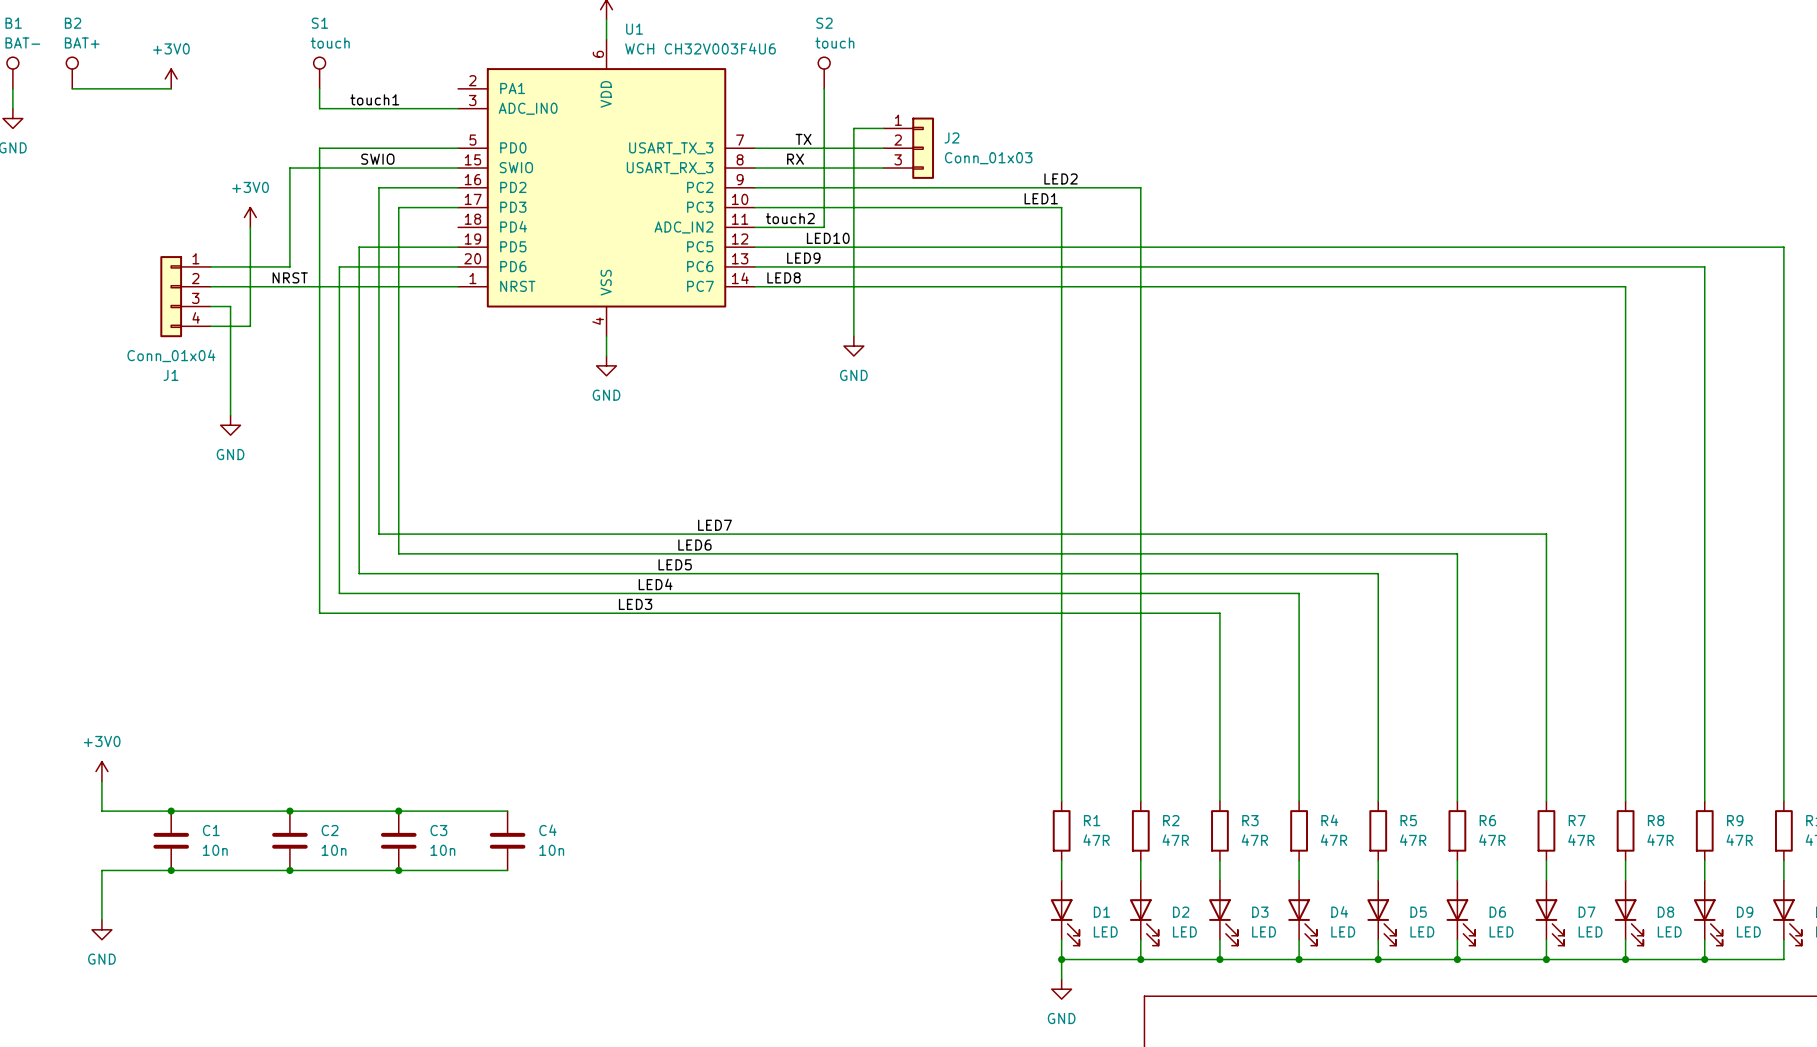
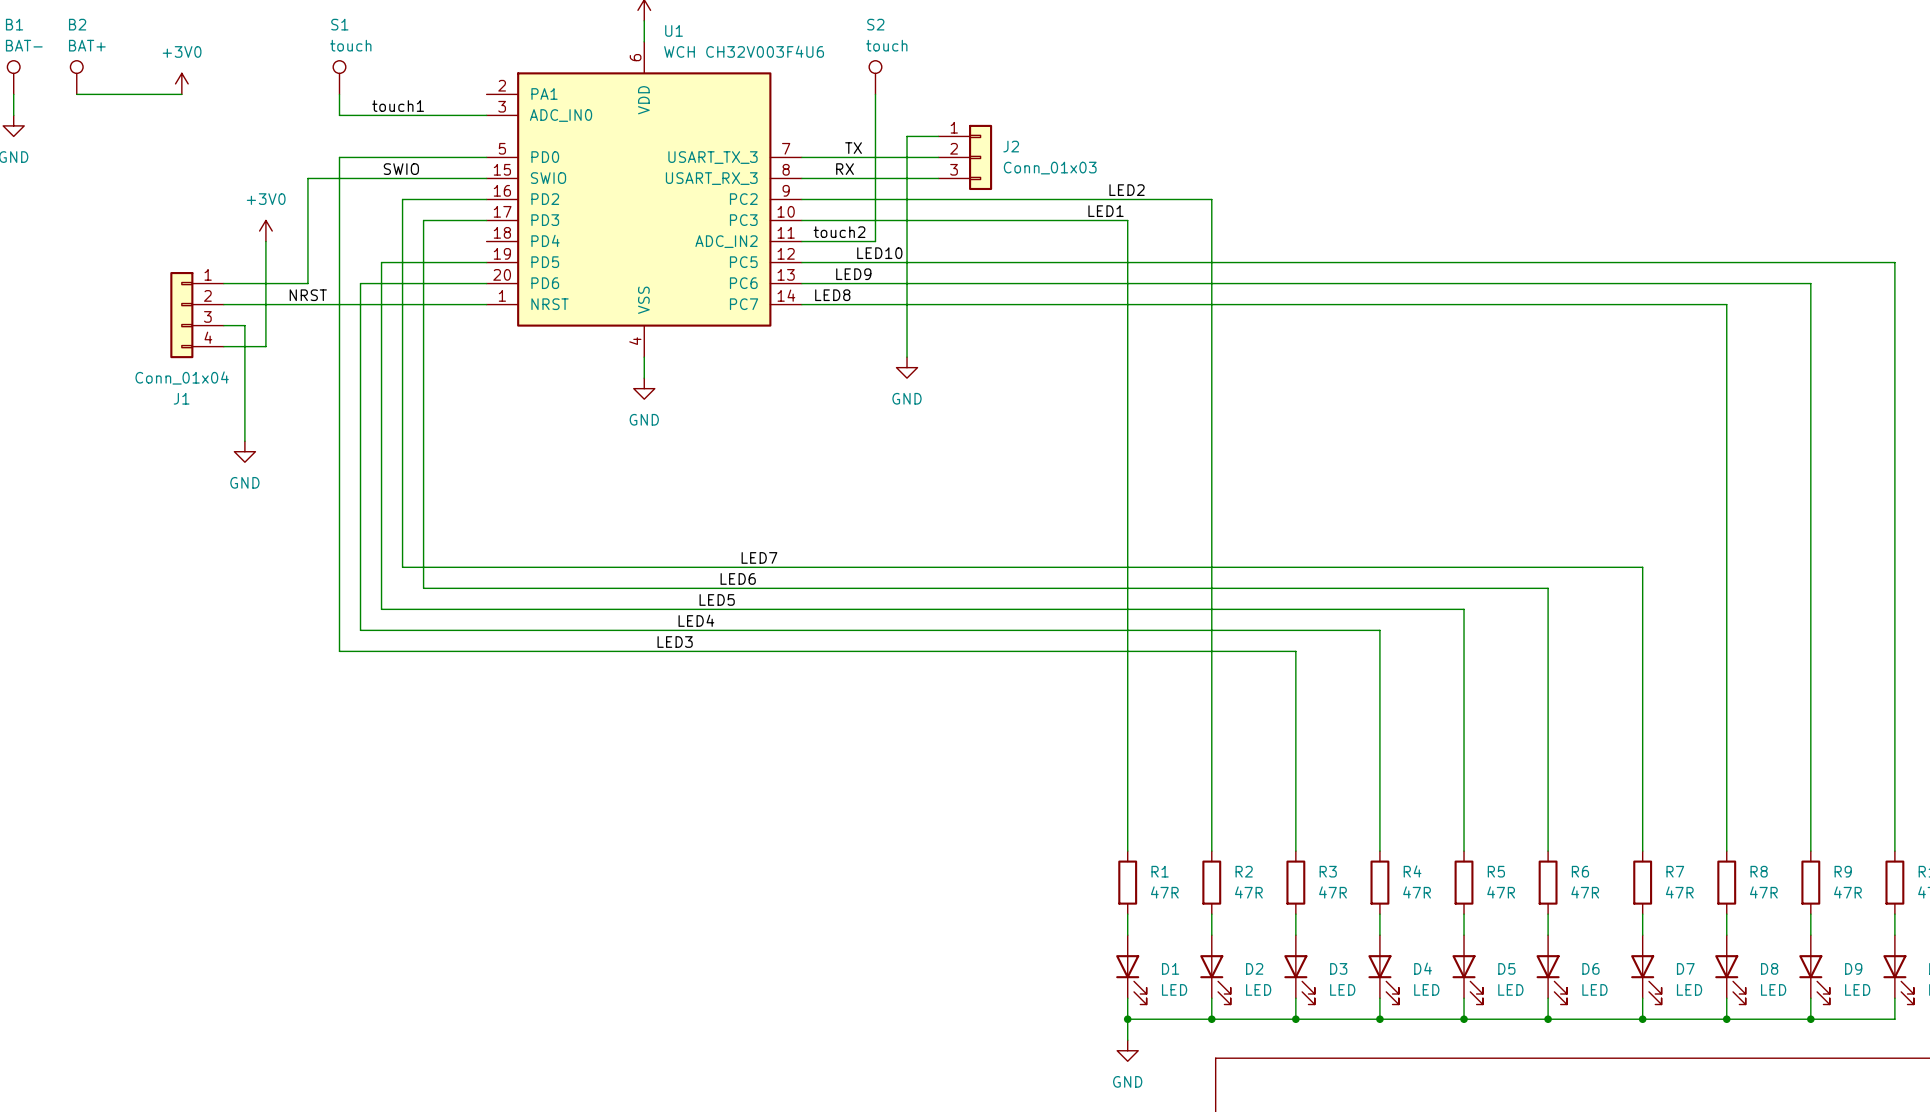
power symbol: +3V0 (101, 771) -> none
wire: (101, 781) (101, 811) (507, 811) -> none
junction: (171, 811) -> none
junction: (289, 811) -> none
junction: (398, 811) -> none
C1: 10n (171, 840) -> none
C2: 10n (289, 840) -> none
C3: 10n (398, 840) -> none
C4: 10n (507, 840) -> none
junction: (171, 870) -> none
junction: (289, 870) -> none
junction: (398, 870) -> none
wire: (507, 870) (101, 870) (101, 919) -> none
power symbol: GND (101, 929) -> none

